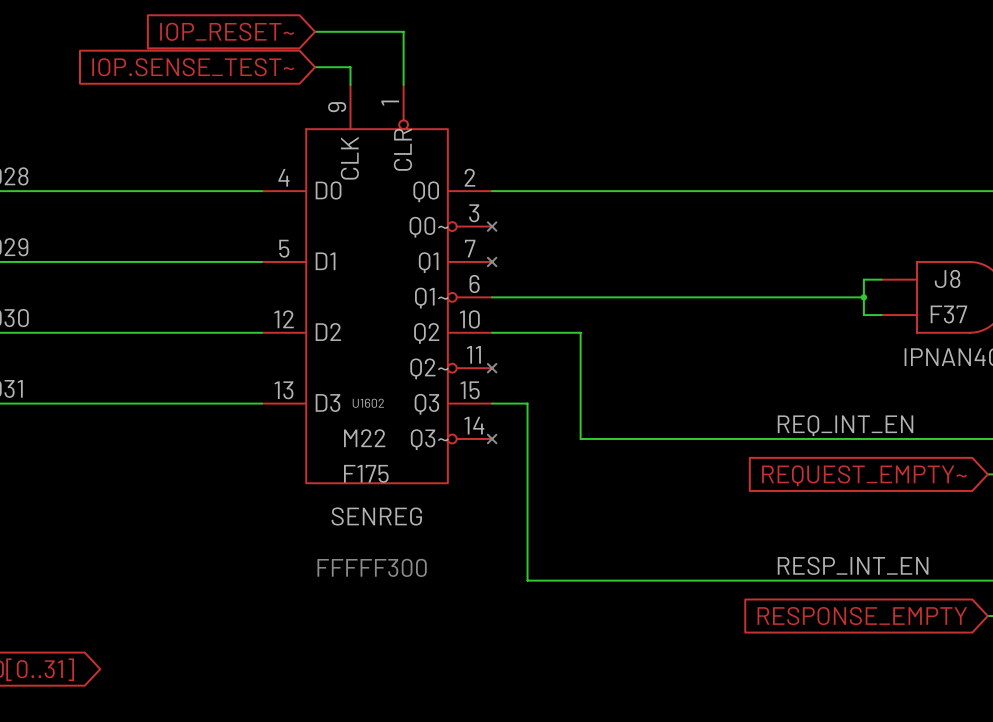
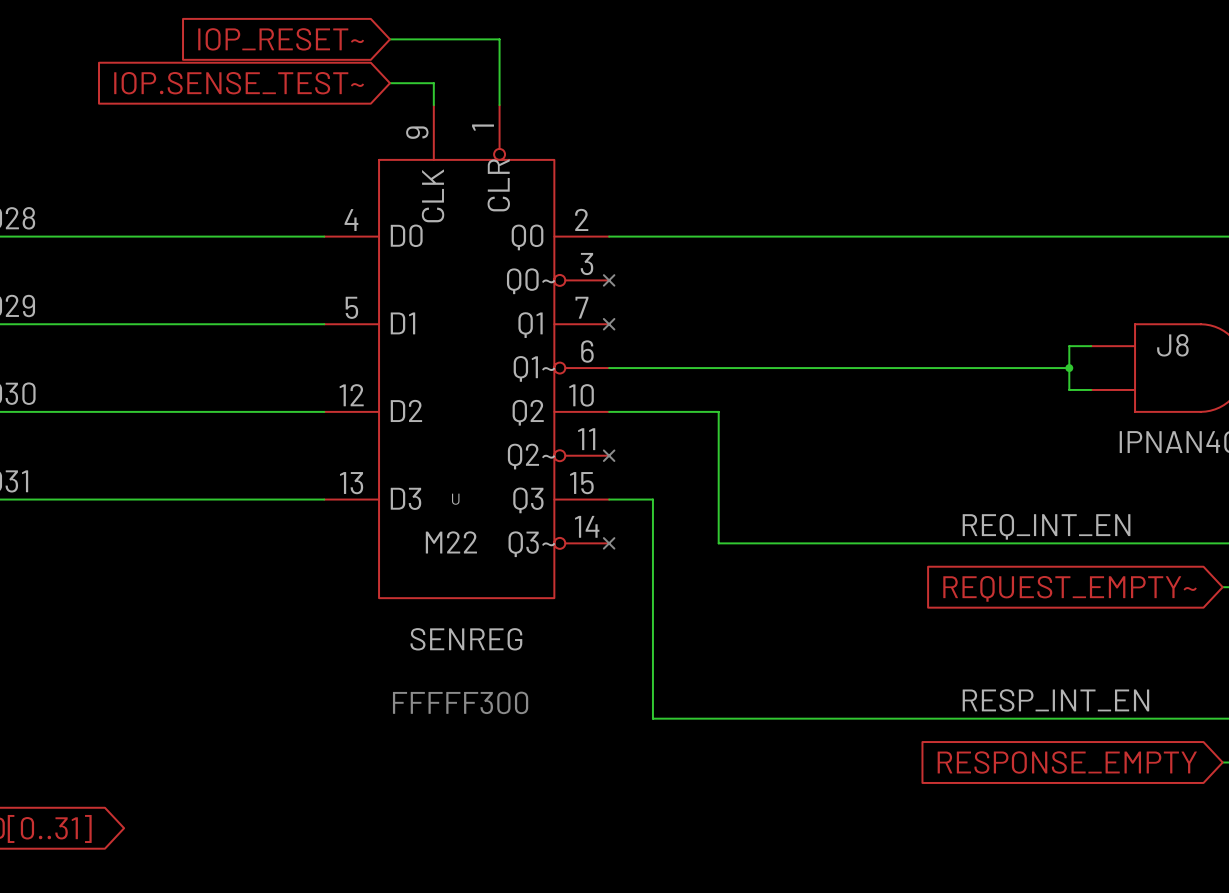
part value: F37 (948, 314) -> none
U1602 name: U1602 (368, 403) -> U (455, 499)
U1602 value: F175 (366, 473) -> none

